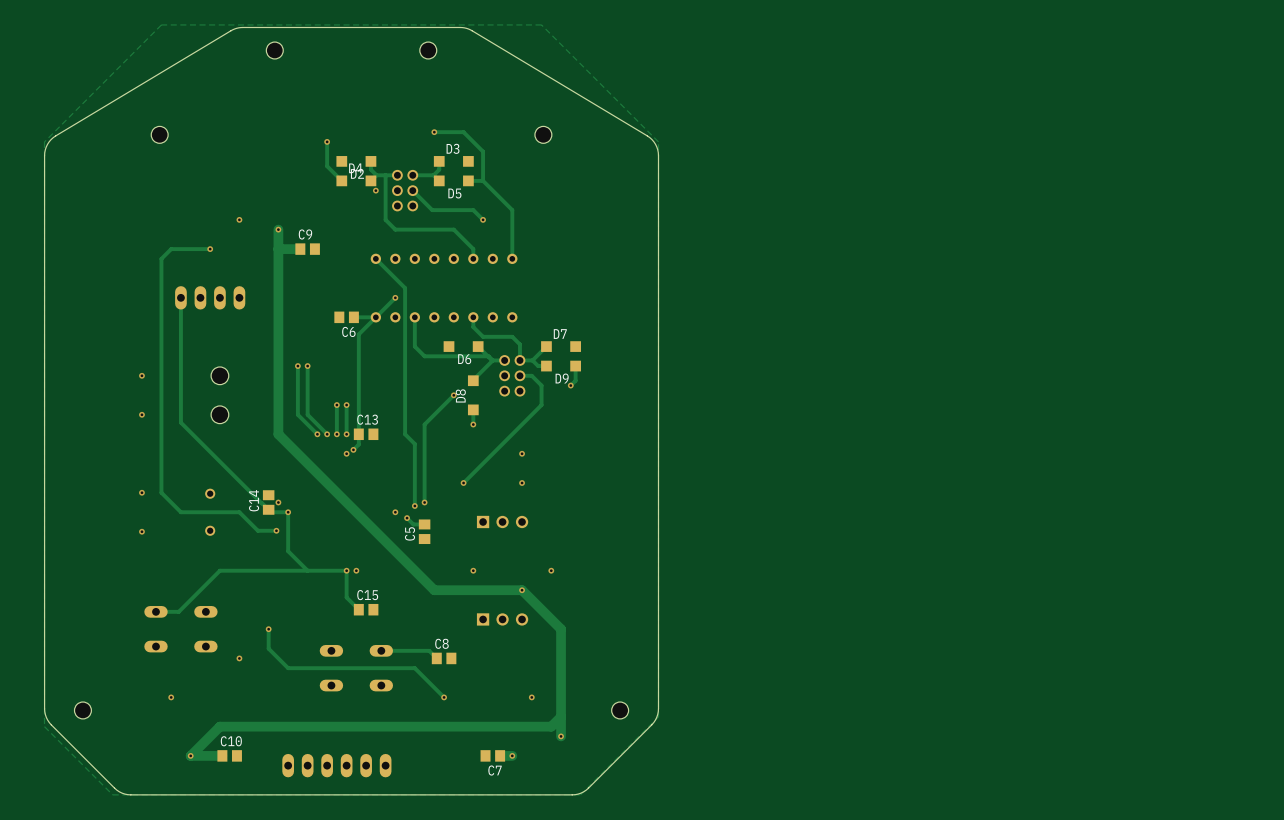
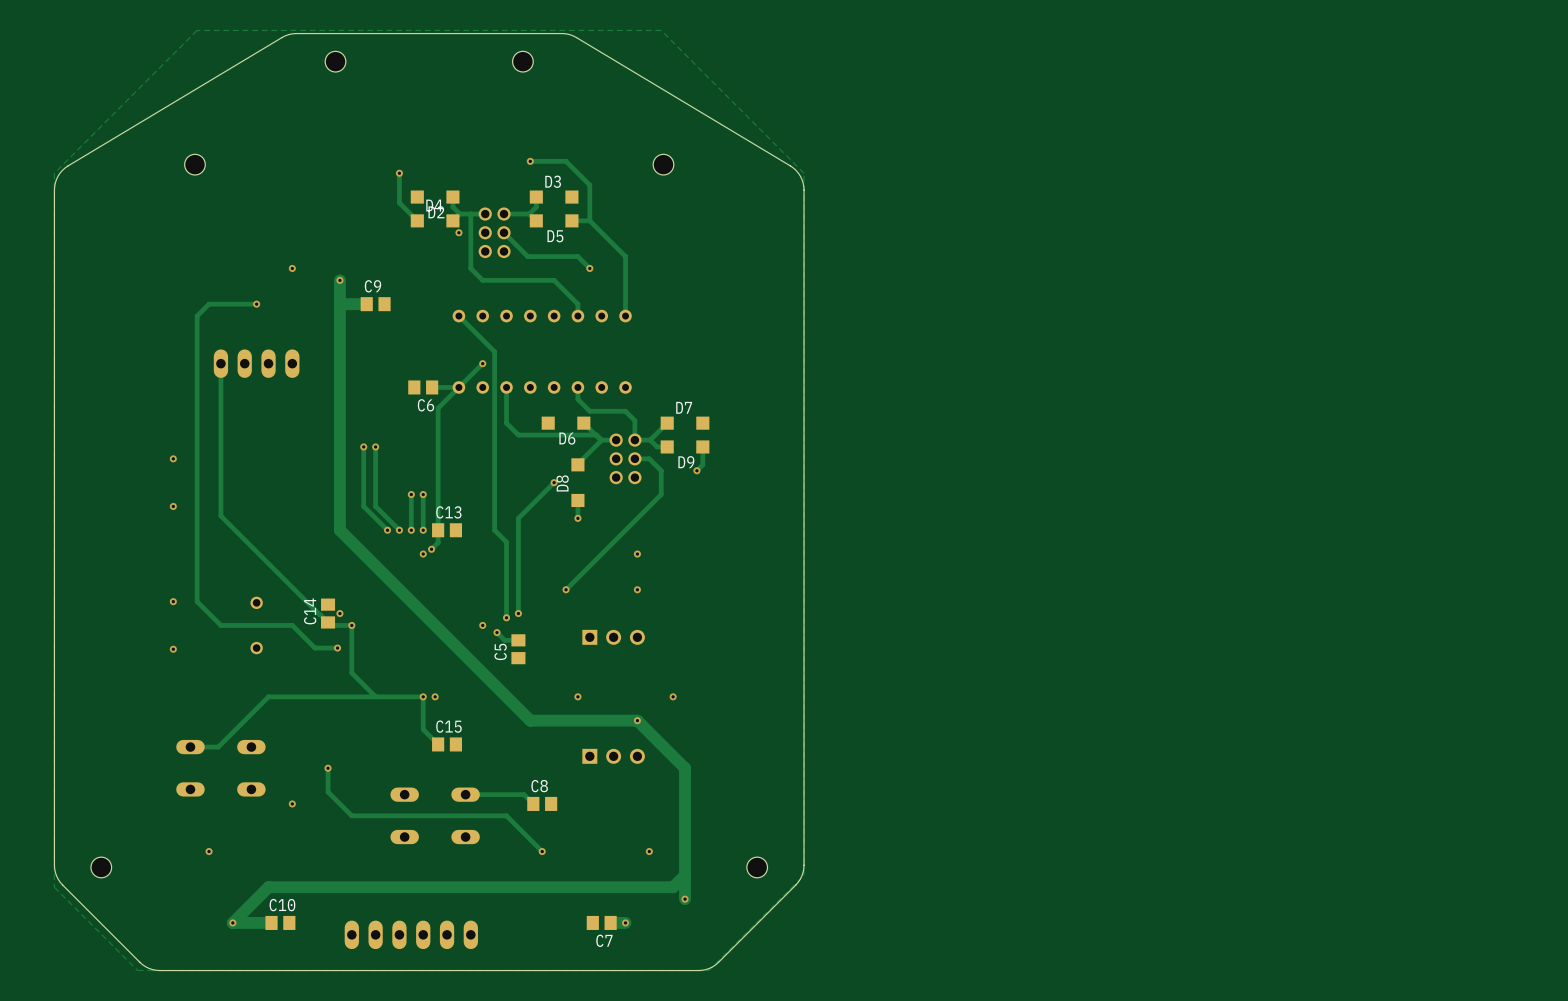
part: (219, 375) -> none
part: (219, 414) -> none

